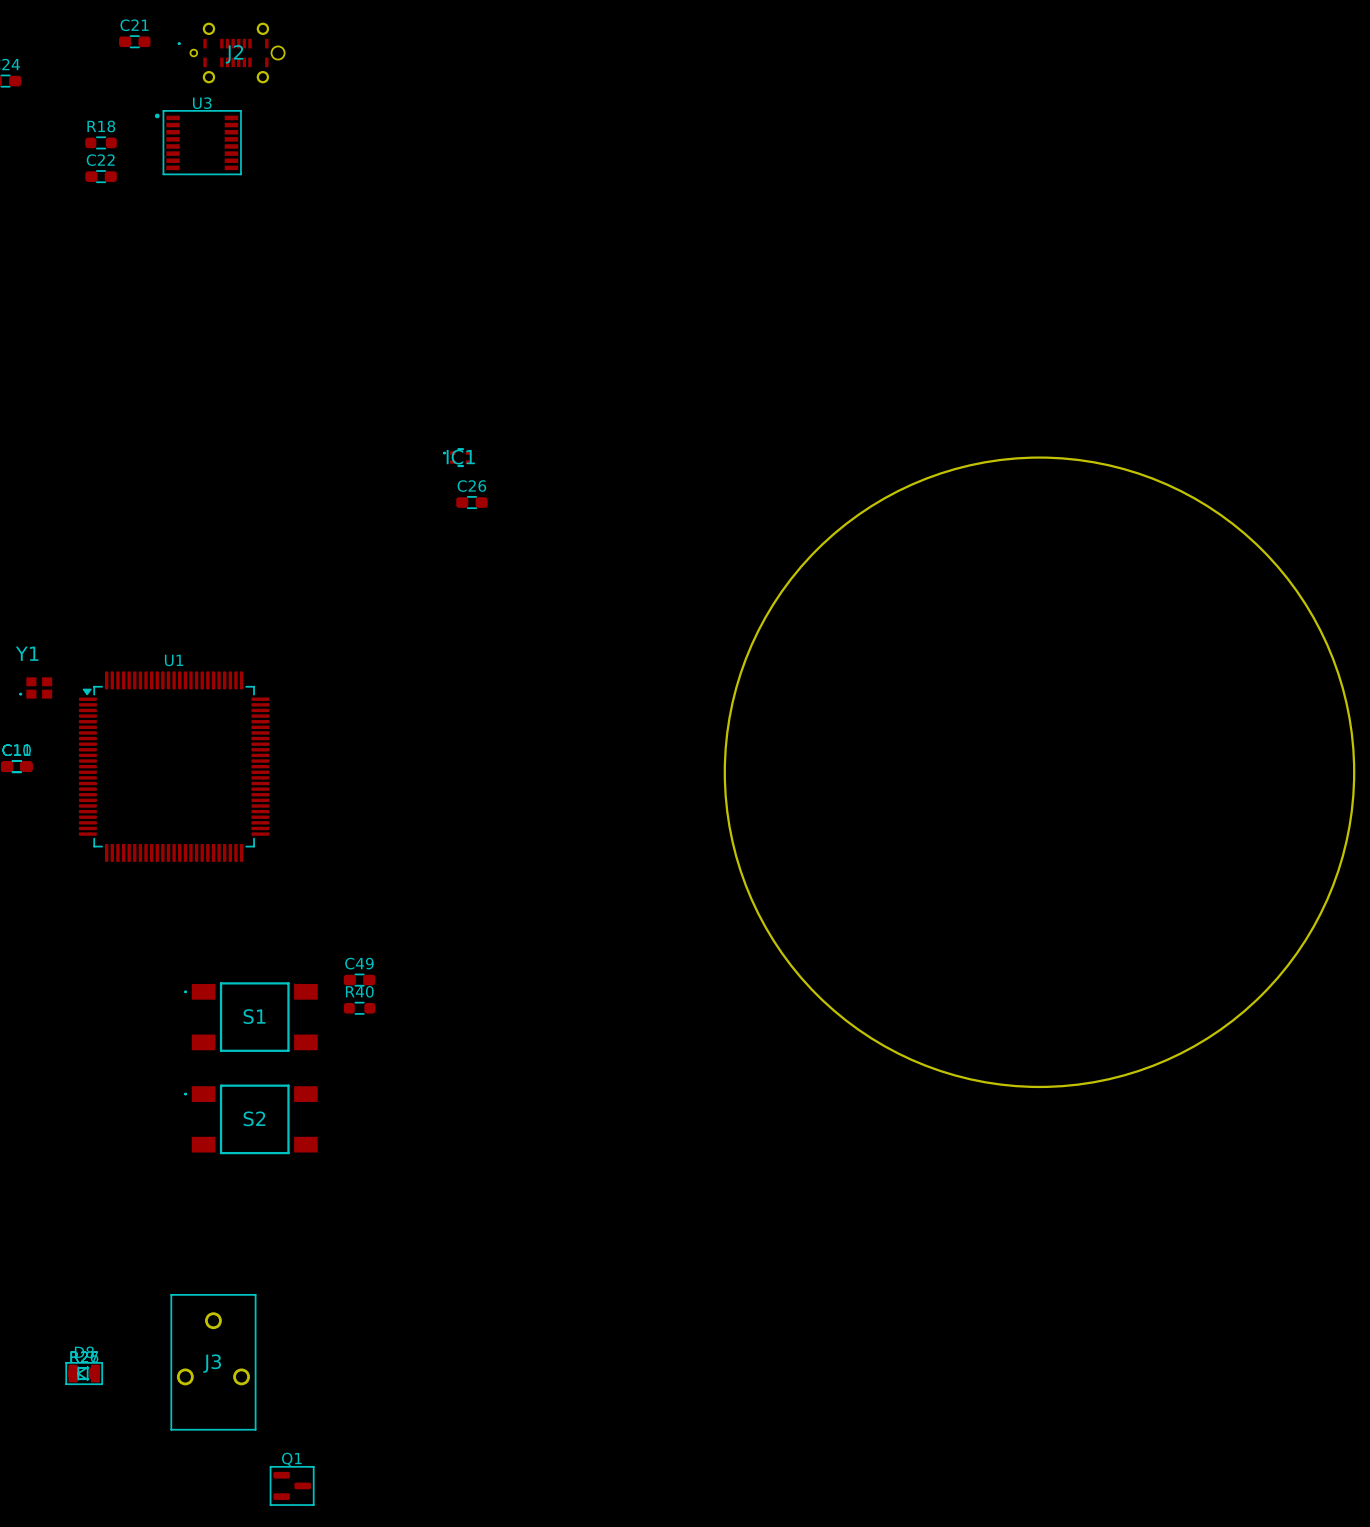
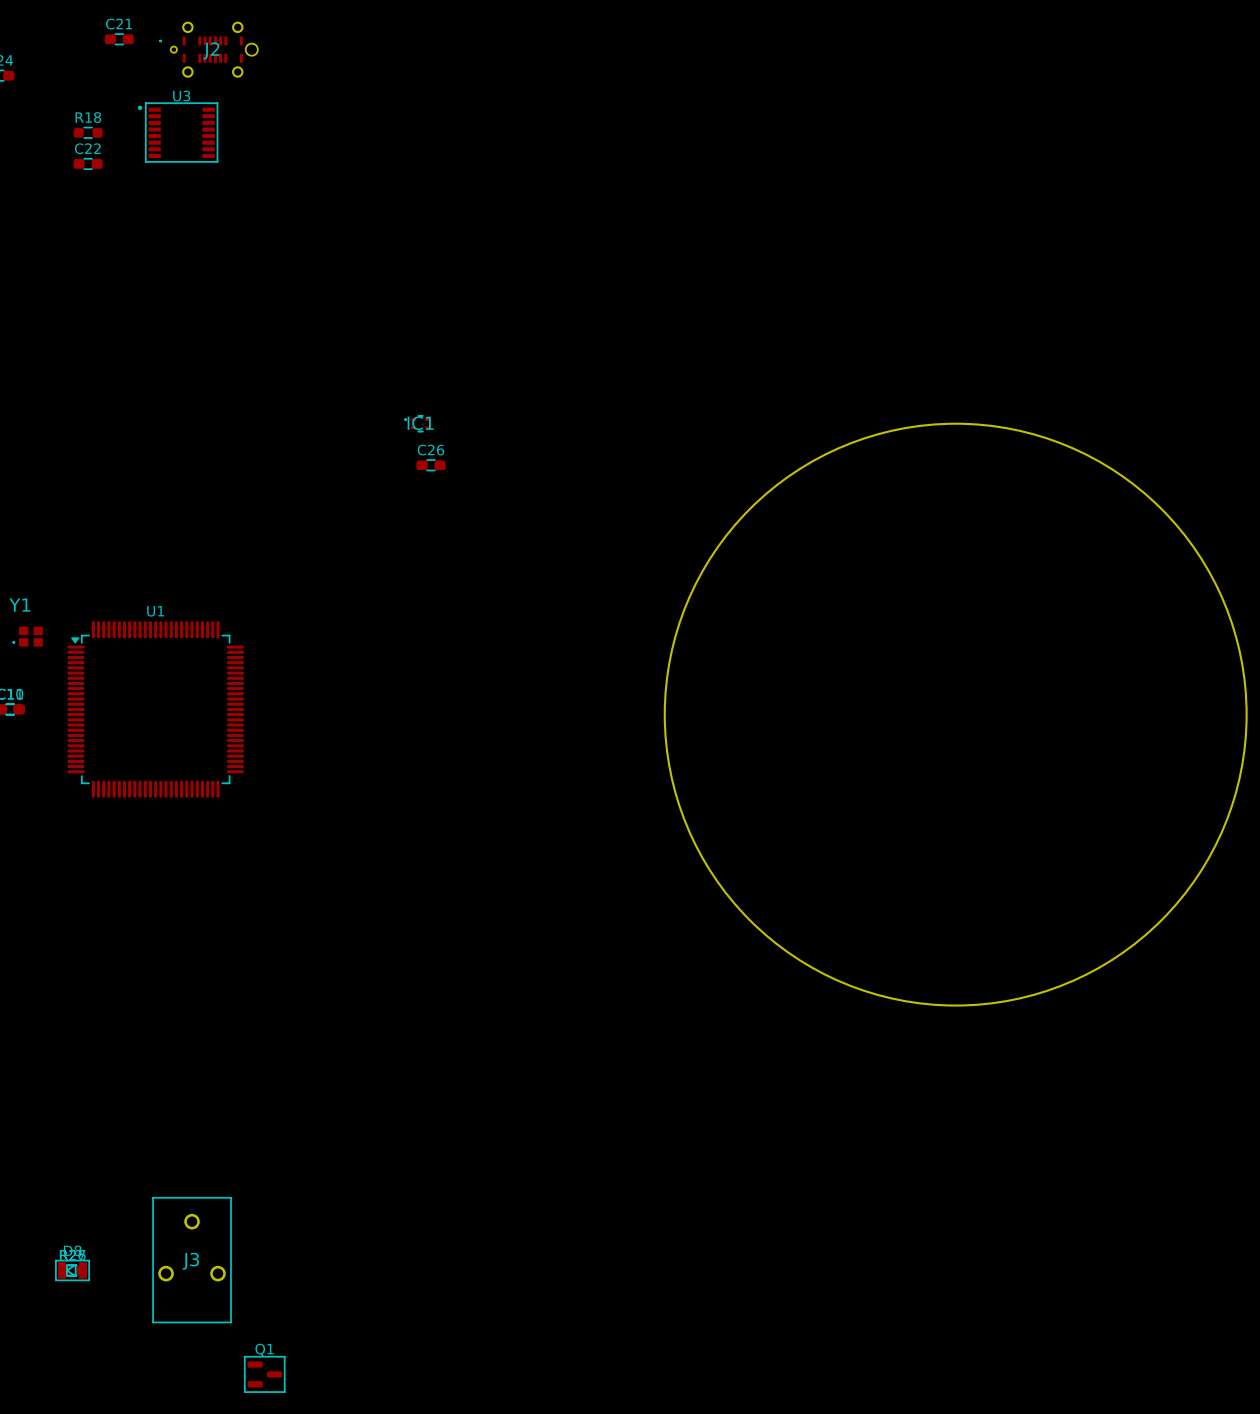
C49: (359, 980) -> none
R40: (359, 1008) -> none
S1: (251, 1017) -> none
S2: (251, 1119) -> none

